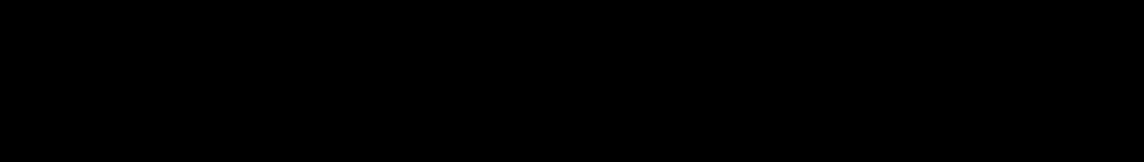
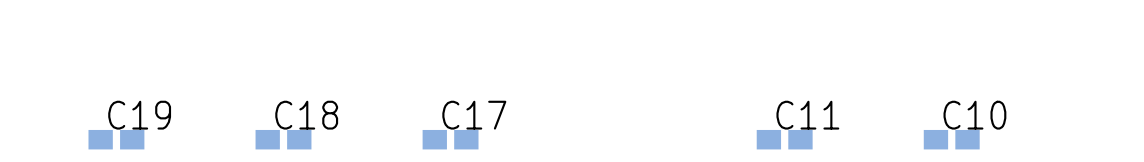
C19: none -> (116, 139)
C18: none -> (283, 139)
C17: none -> (450, 139)
C11: none -> (784, 139)
C10: none -> (951, 139)

